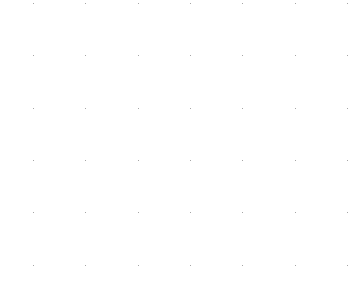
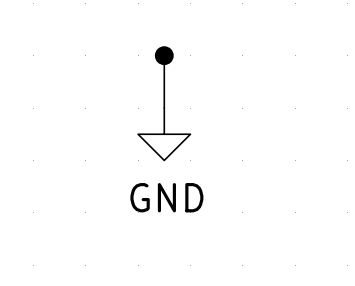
wire: none -> (164, 55) (164, 108)
junction: none -> (164, 55)
power symbol: none -> GND (164, 134)

